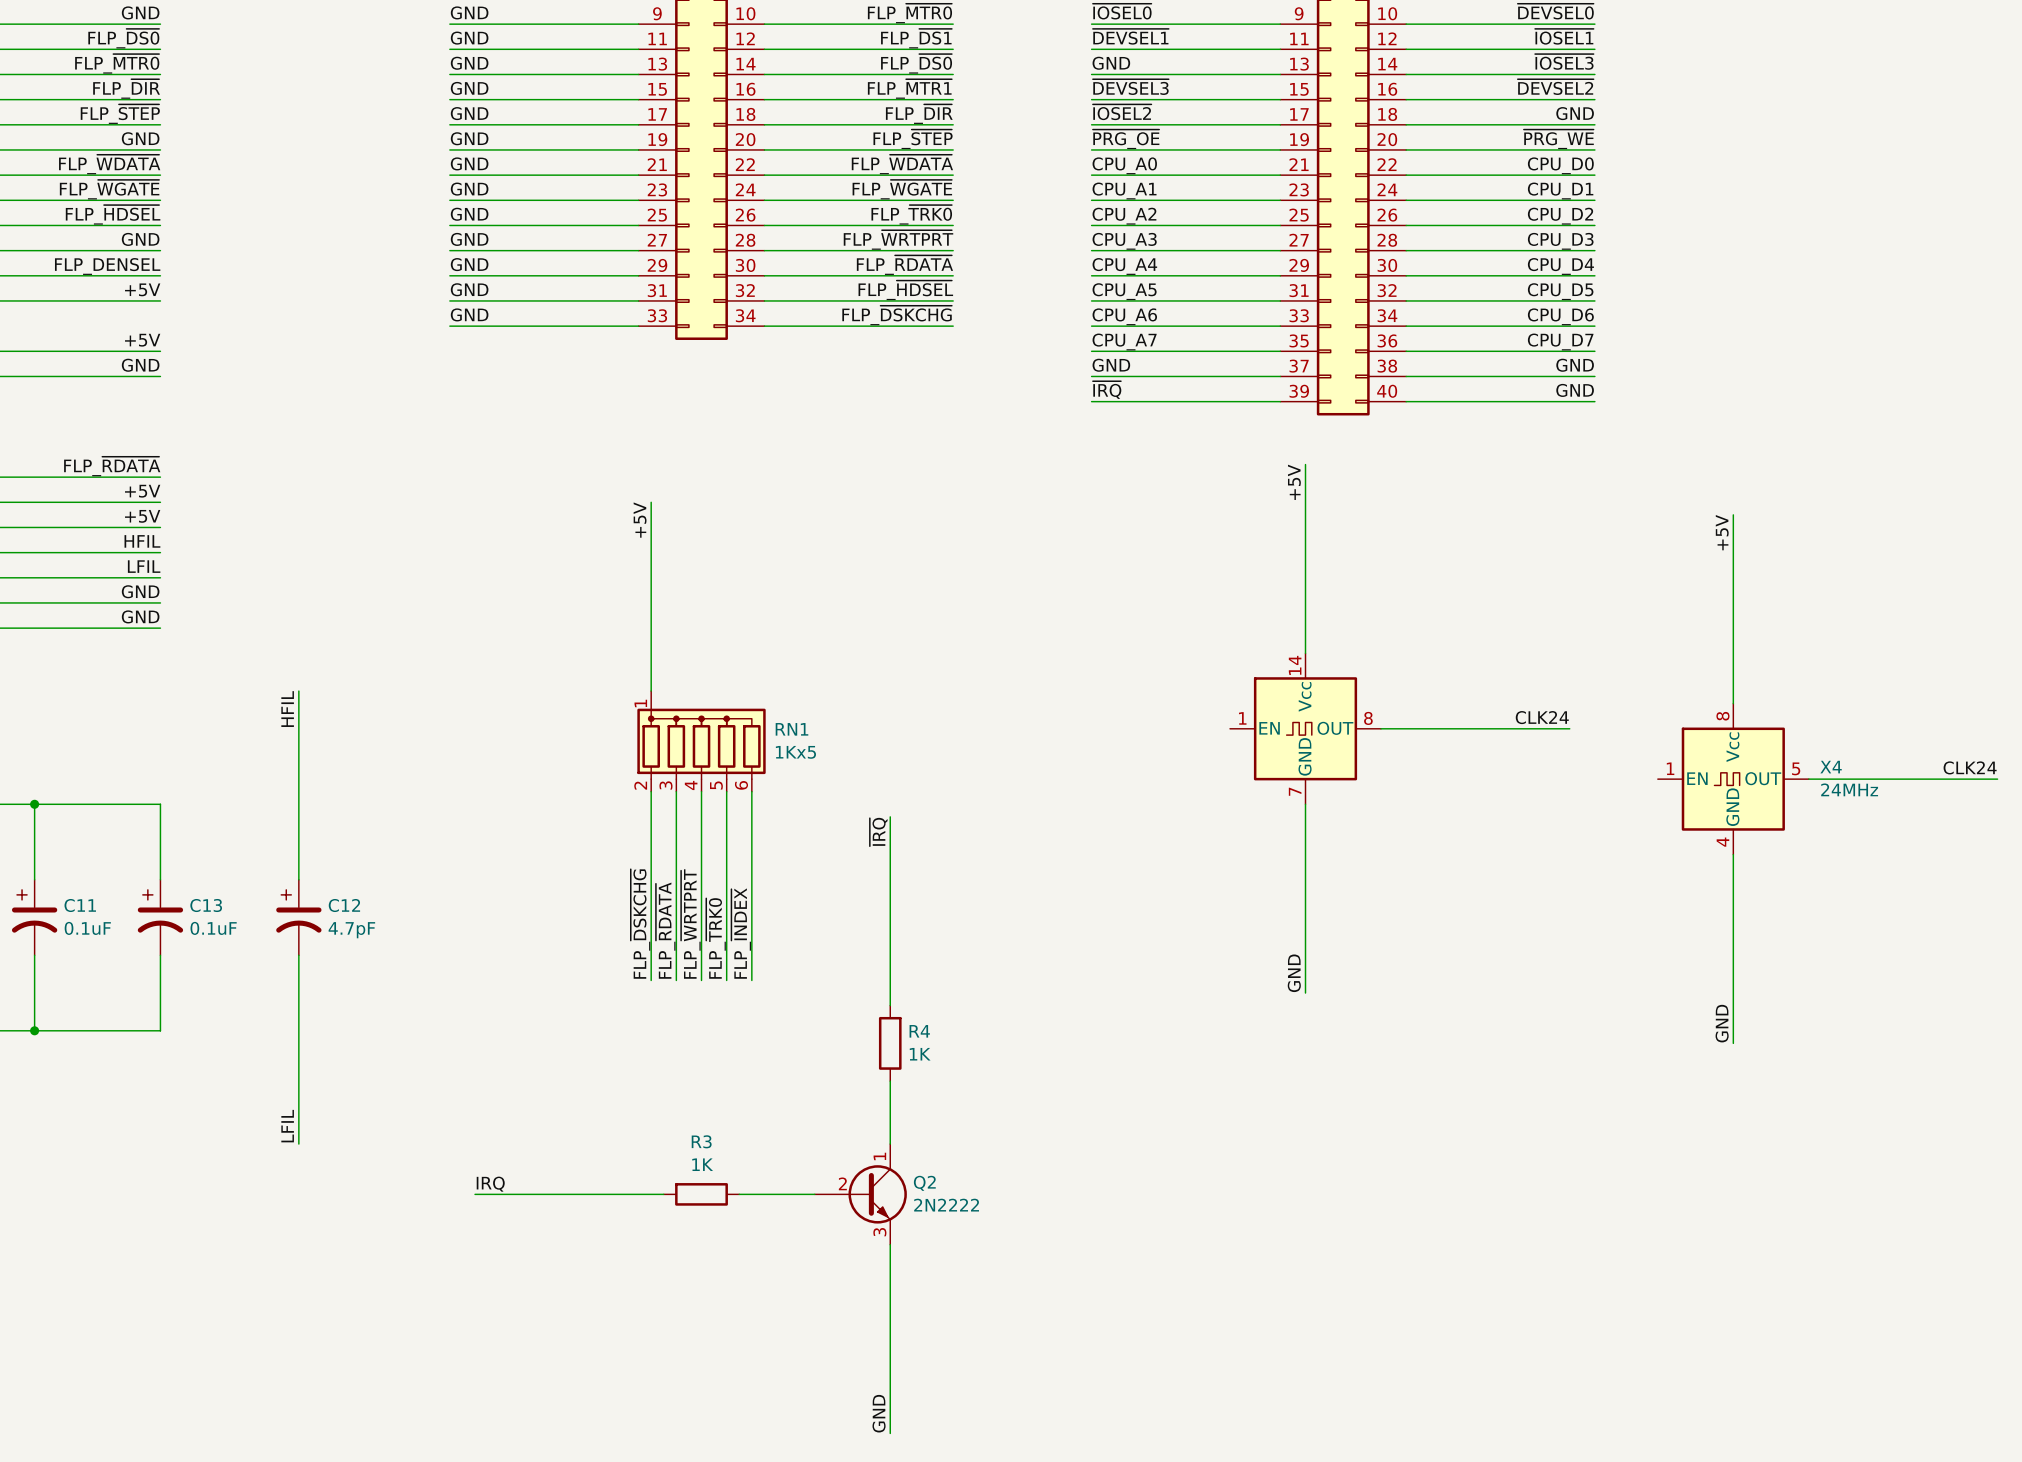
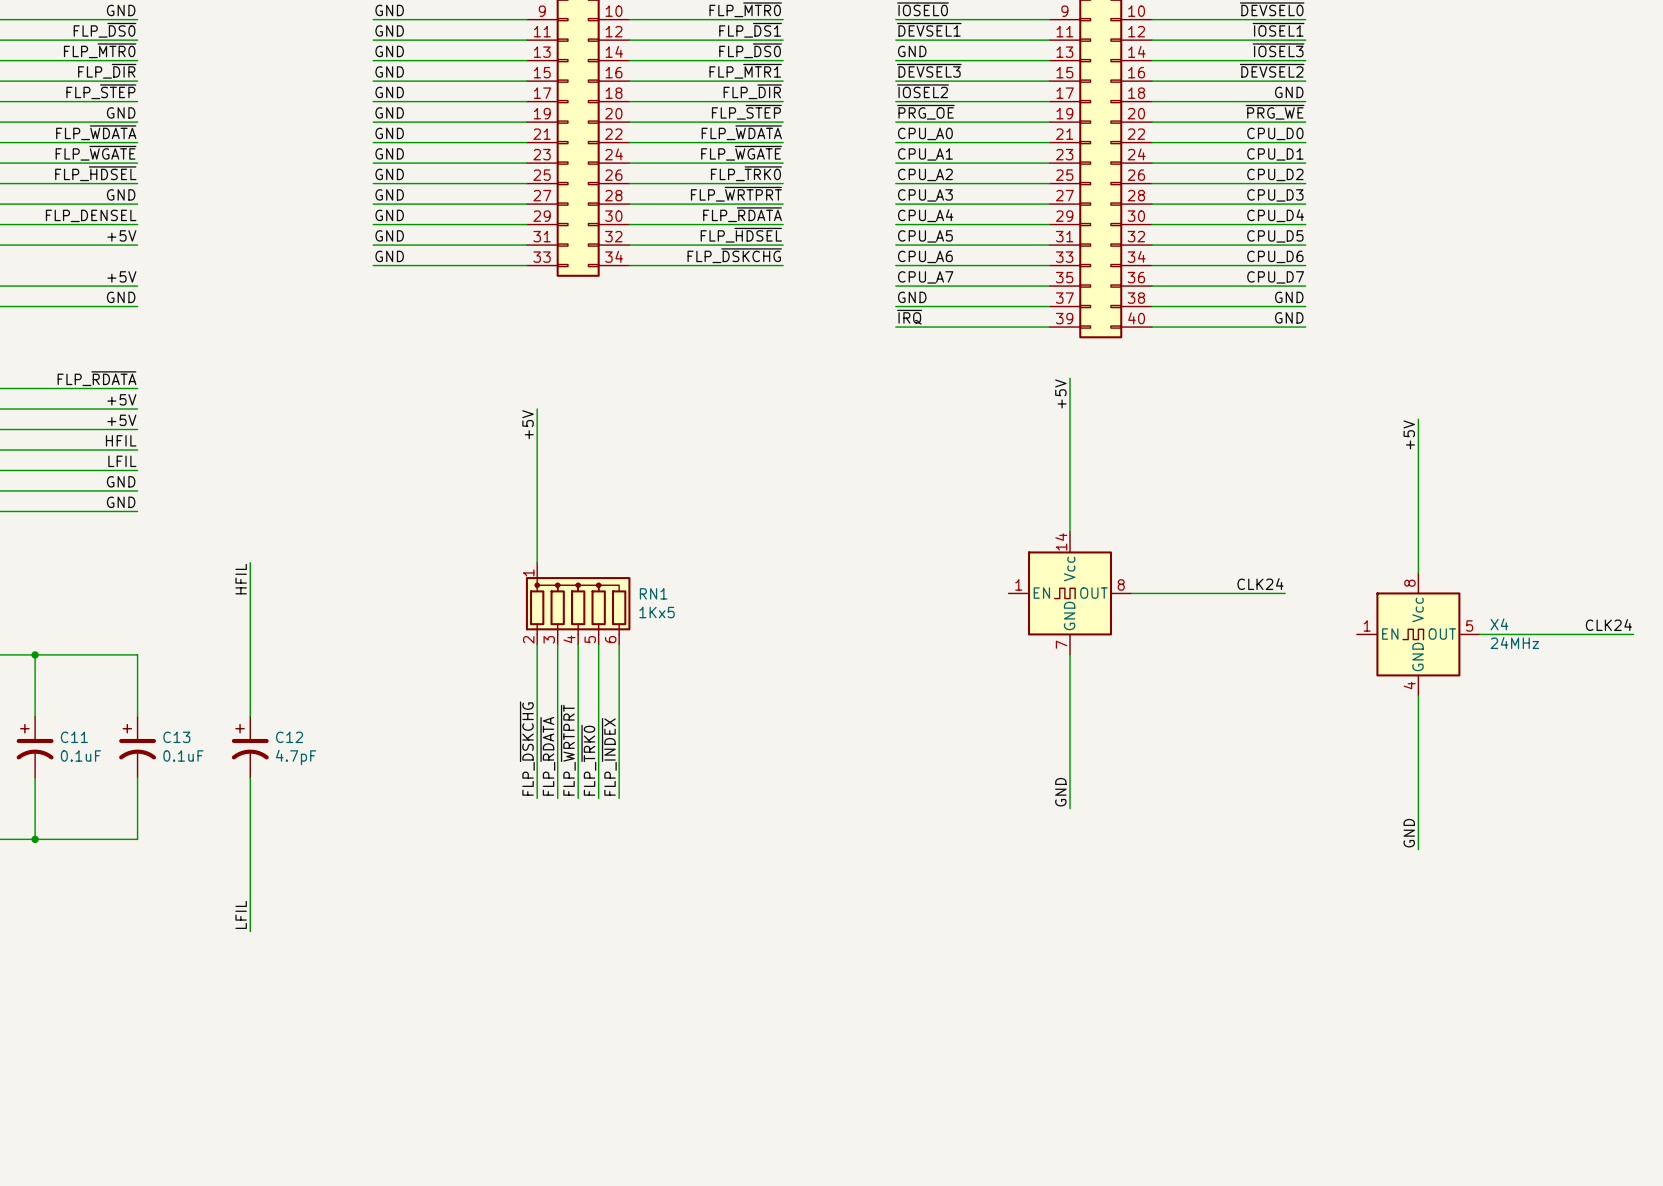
wire: (890, 816) (890, 1005) -> none
label: ~{IRQ} (878, 832) -> none
R4: 1K (890, 1043) -> none
wire: (890, 1081) (890, 1144) -> none
label: IRQ (490, 1184) -> none
wire: (475, 1194) (663, 1194) -> none
R3: 1K (701, 1194) -> none
wire: (739, 1194) (814, 1194) -> none
Q2: 2N2222 (860, 1194) -> none
wire: (890, 1244) (890, 1433) -> none
label: GND (879, 1413) -> none

